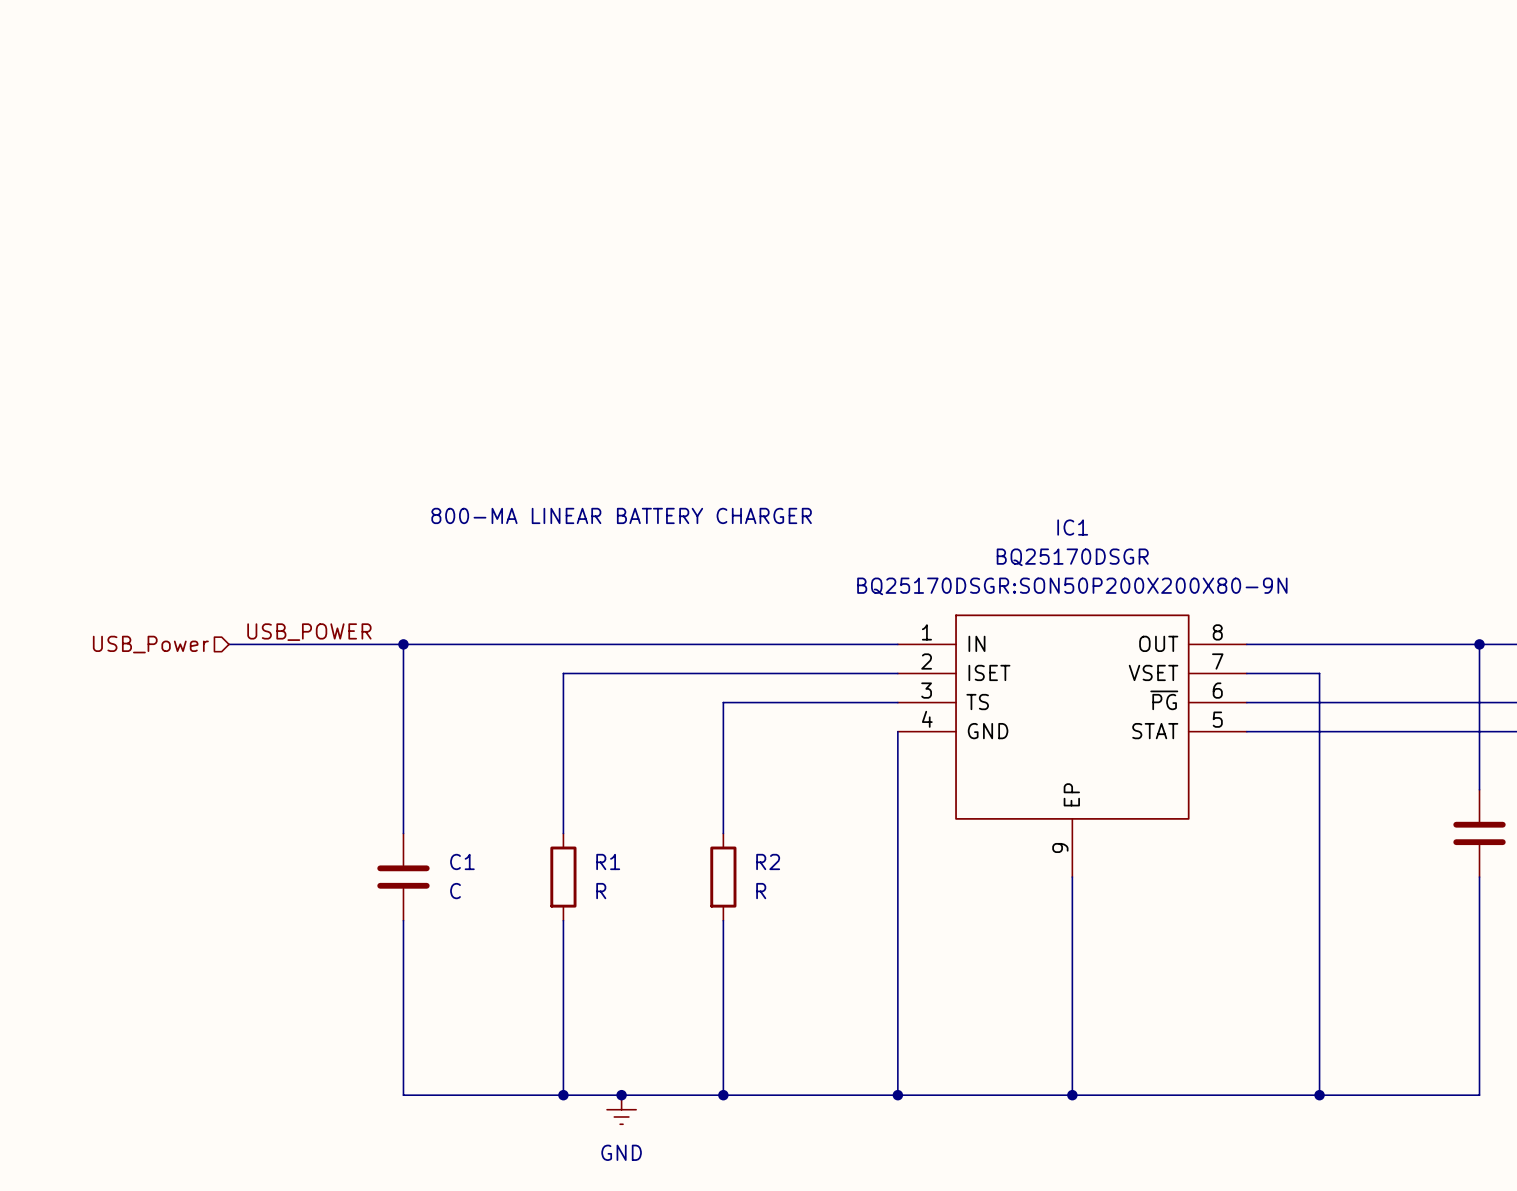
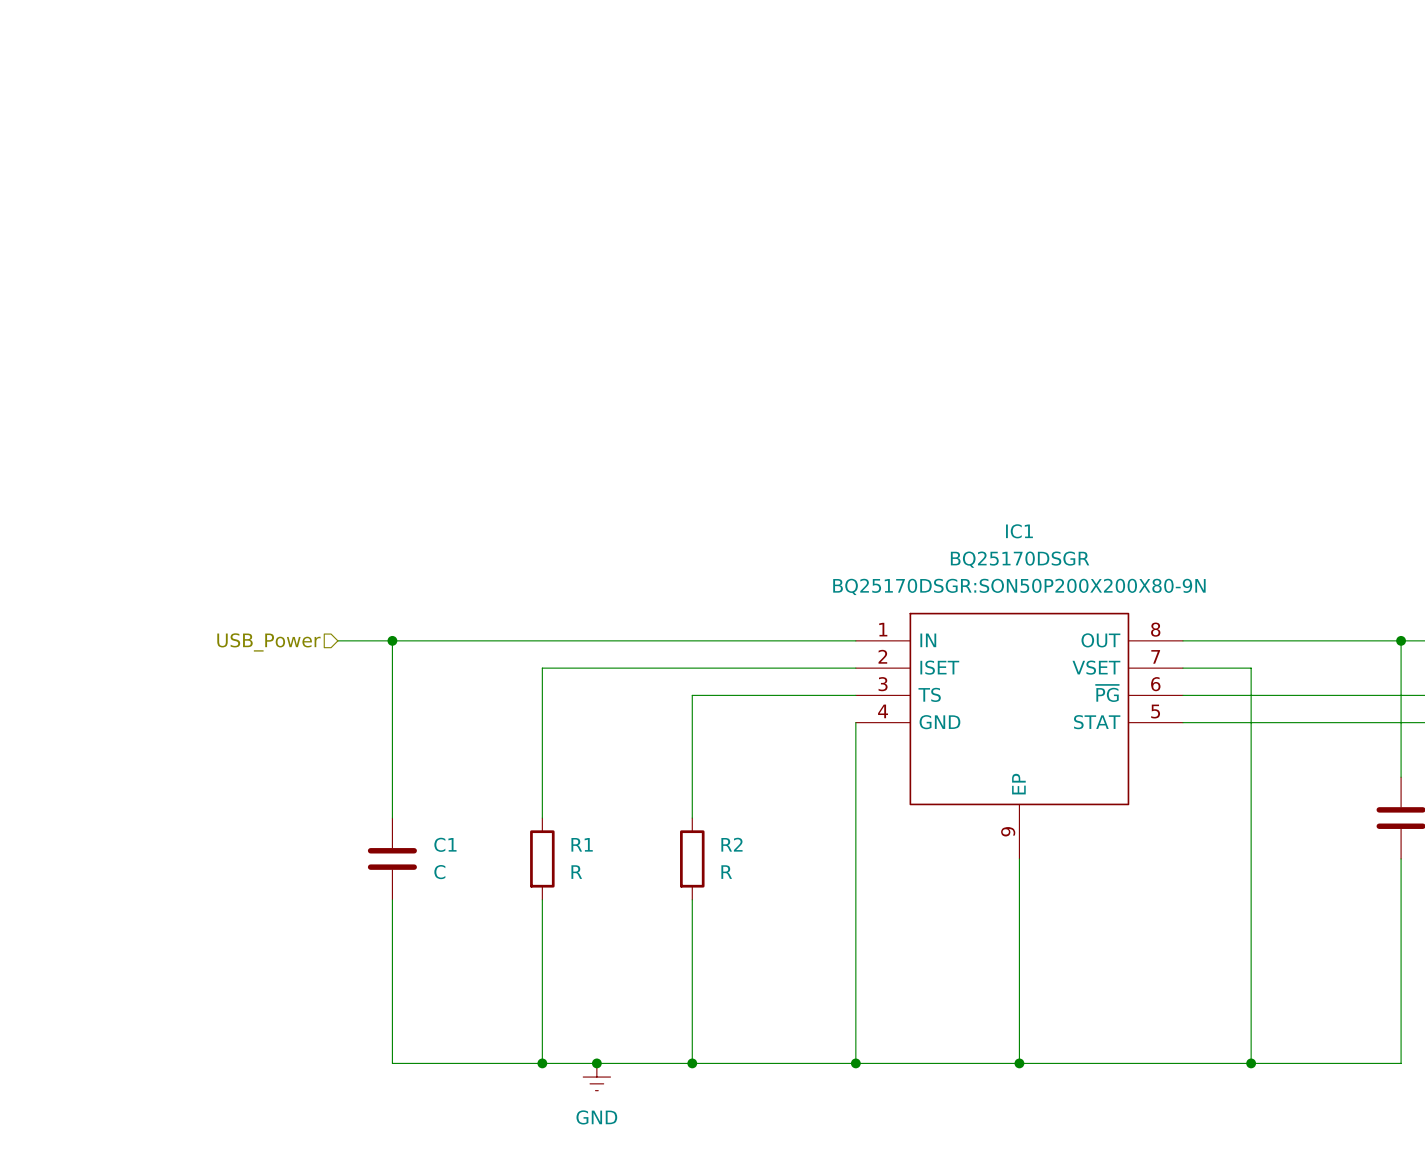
text: 800-MA LINEAR BATTERY CHARGER (621, 515) -> none
label: USB_POWER (309, 632) -> none
hierarchical label position: USB_Power (150, 644) -> USB_Power (268, 642)
wire: (228, 644) (345, 644) -> none

